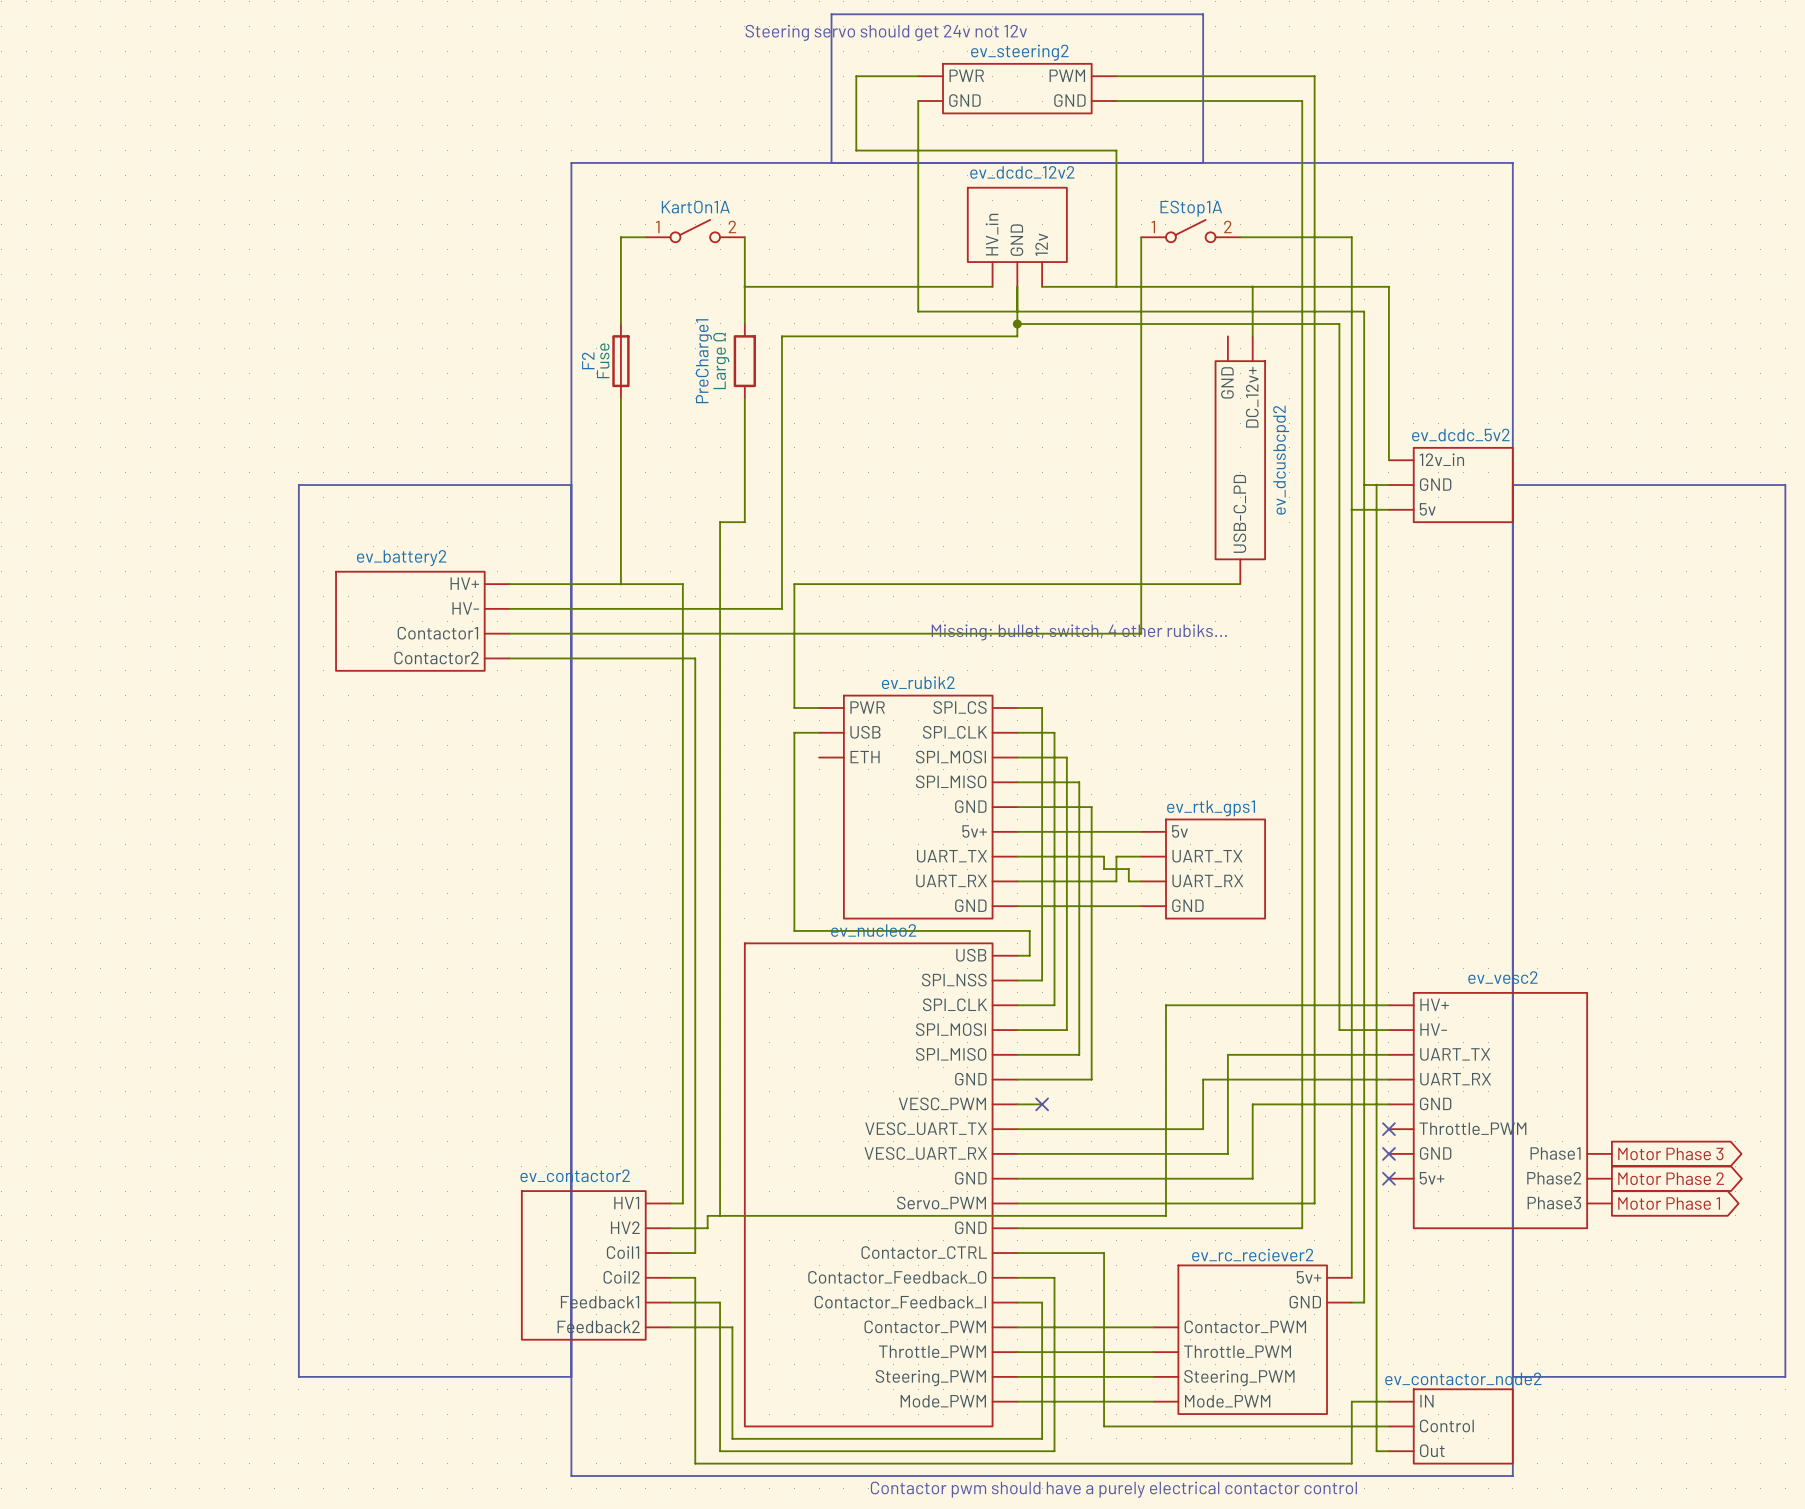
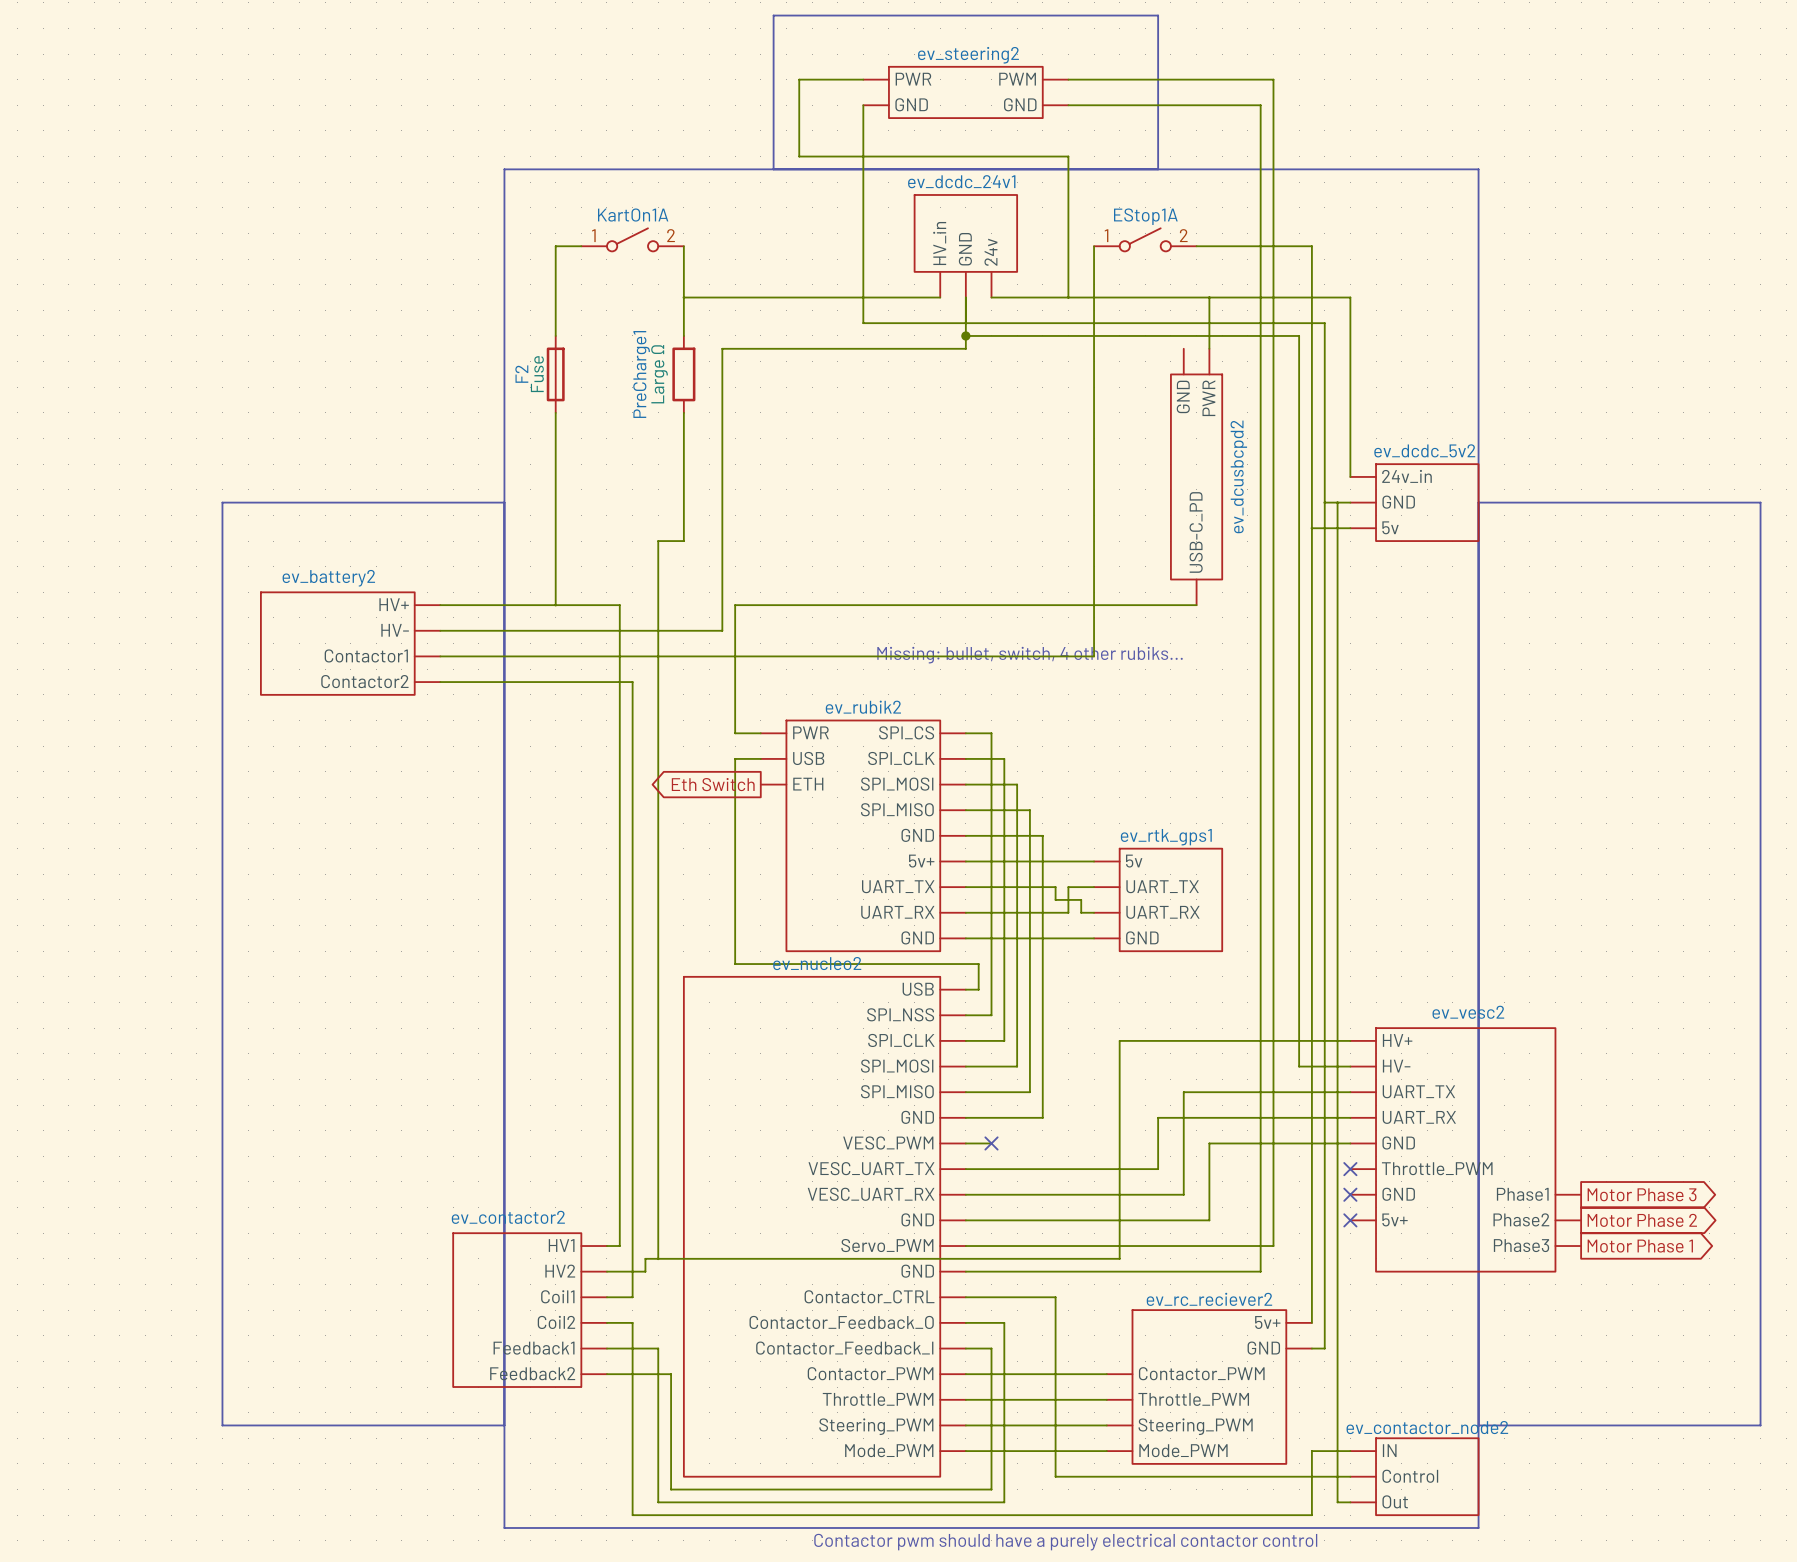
text: Steering servo should get 24v not 12v (886, 32) -> none
ev_dcdc_12v2 name: ev_dcdc_12v2 (1022, 172) -> ev_dcdc_24v1 (961, 181)
ev_dcdc_12v2 pin name: 12v (1041, 244) -> 24v (990, 252)
ev_dcusbcpd2 pin name: DC_12v+ (1252, 397) -> PWR (1208, 398)
ev_dcdc_5v2 pin name: 12v_in (1441, 459) -> 24v_in (1406, 476)
global label: none -> Eth Switch (713, 784)

